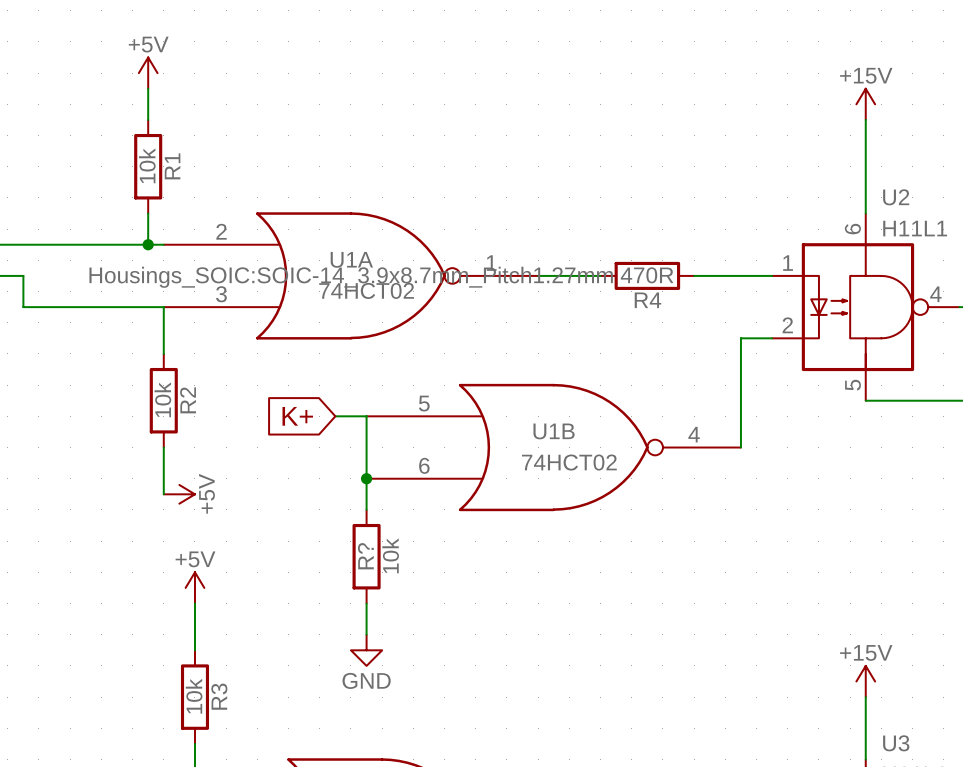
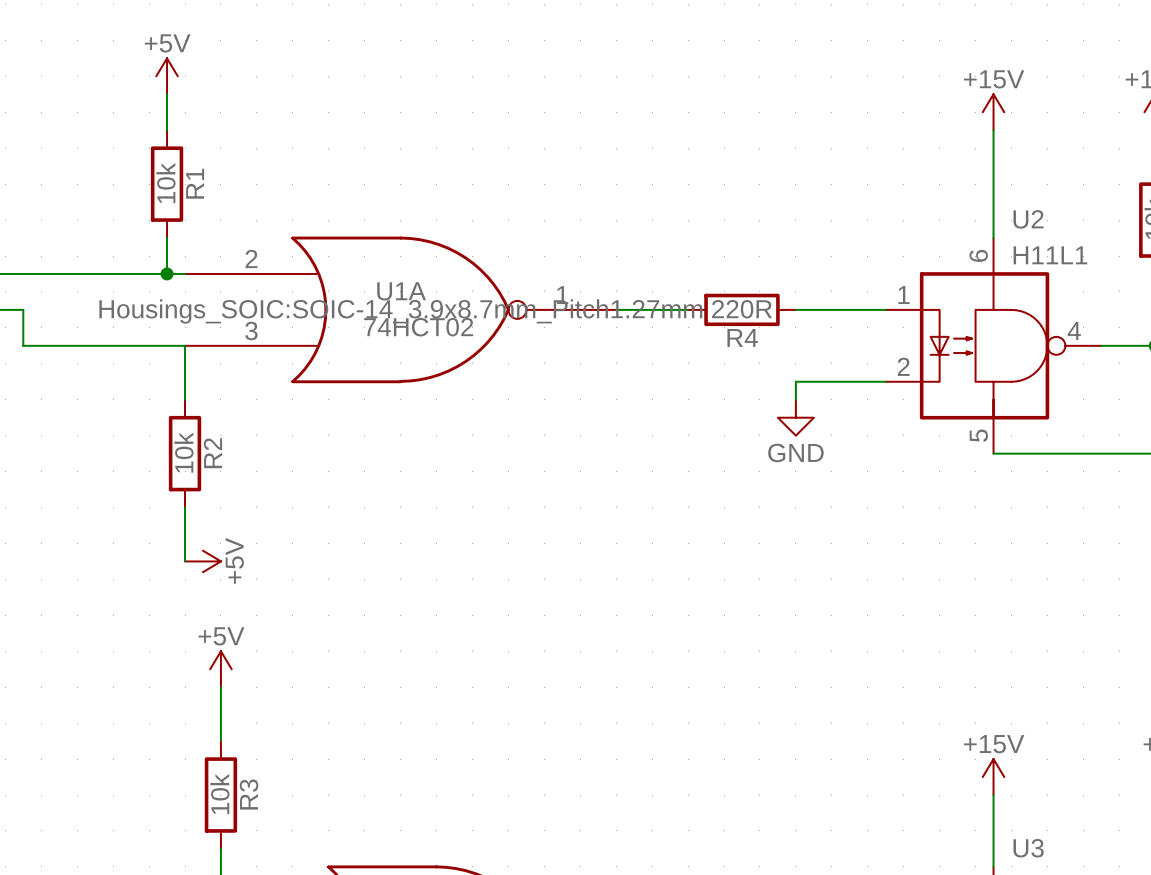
R4 value: 470R (647, 275) -> 220R (742, 309)
wire: (740, 338) (740, 447) -> (849, 381) (795, 381) (795, 399)
power symbol: none -> GND (795, 417)
global label: K+ (297, 416) -> none
wire: (335, 416) (366, 416) (366, 509) -> none
U1B: 74HCT02 (553, 447) -> none
junction: (366, 478) -> none
10k: R? (366, 556) -> none
wire: (366, 603) (366, 634) -> none
power symbol: GND (366, 650) -> none

